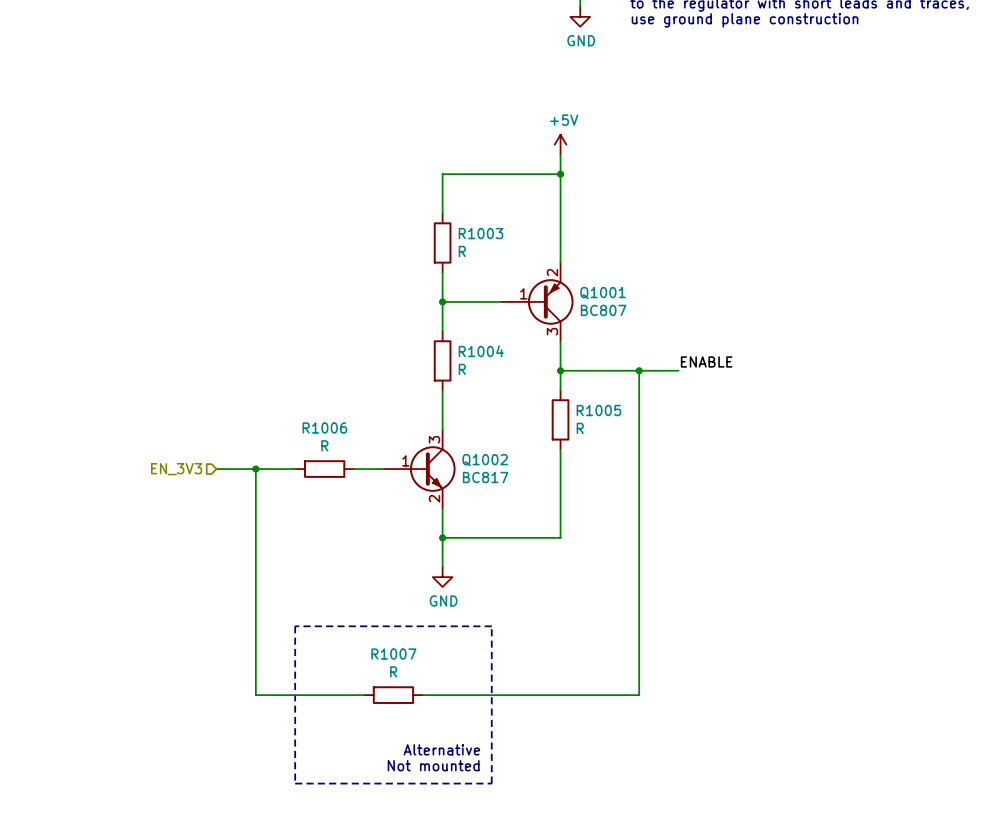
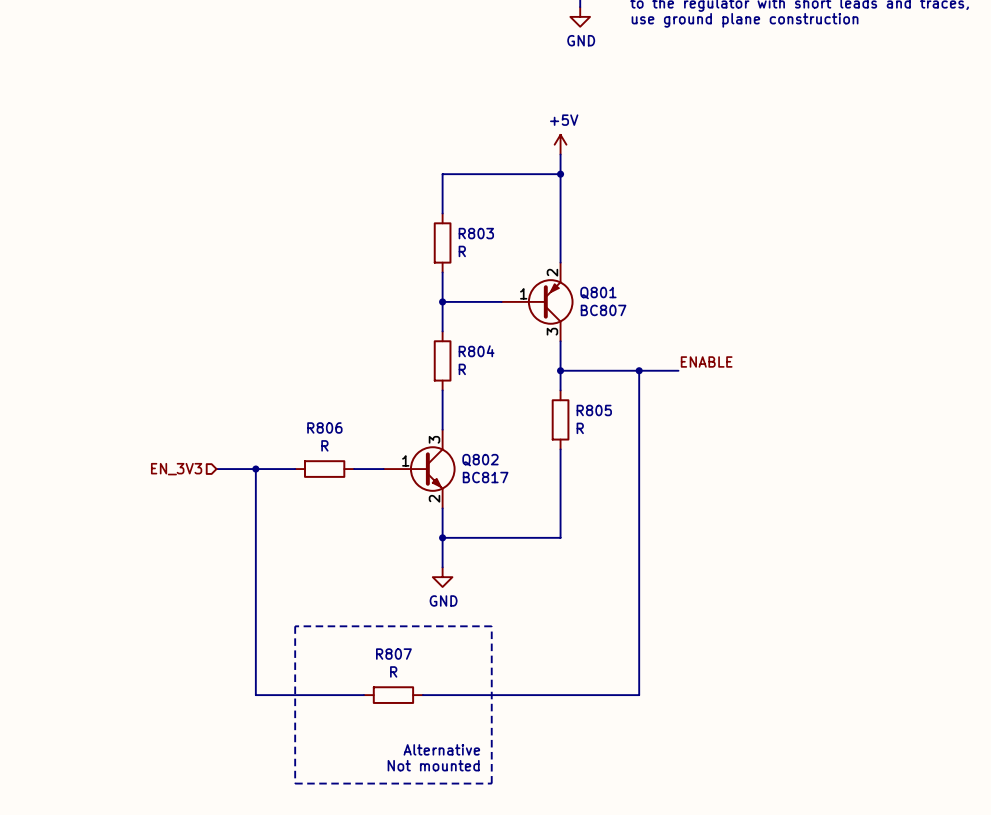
R1003 name: R1003 (481, 233) -> R803 (476, 233)
Q1001 name: Q1001 (603, 293) -> Q801 (598, 293)
R1004 name: R1004 (481, 351) -> R804 (476, 351)
R1005 name: R1005 (598, 410) -> R805 (594, 410)
R1006 name: R1006 (324, 427) -> R806 (324, 427)
Q1002 name: Q1002 (485, 460) -> Q802 (480, 460)
R1007 name: R1007 (393, 654) -> R807 (393, 654)

